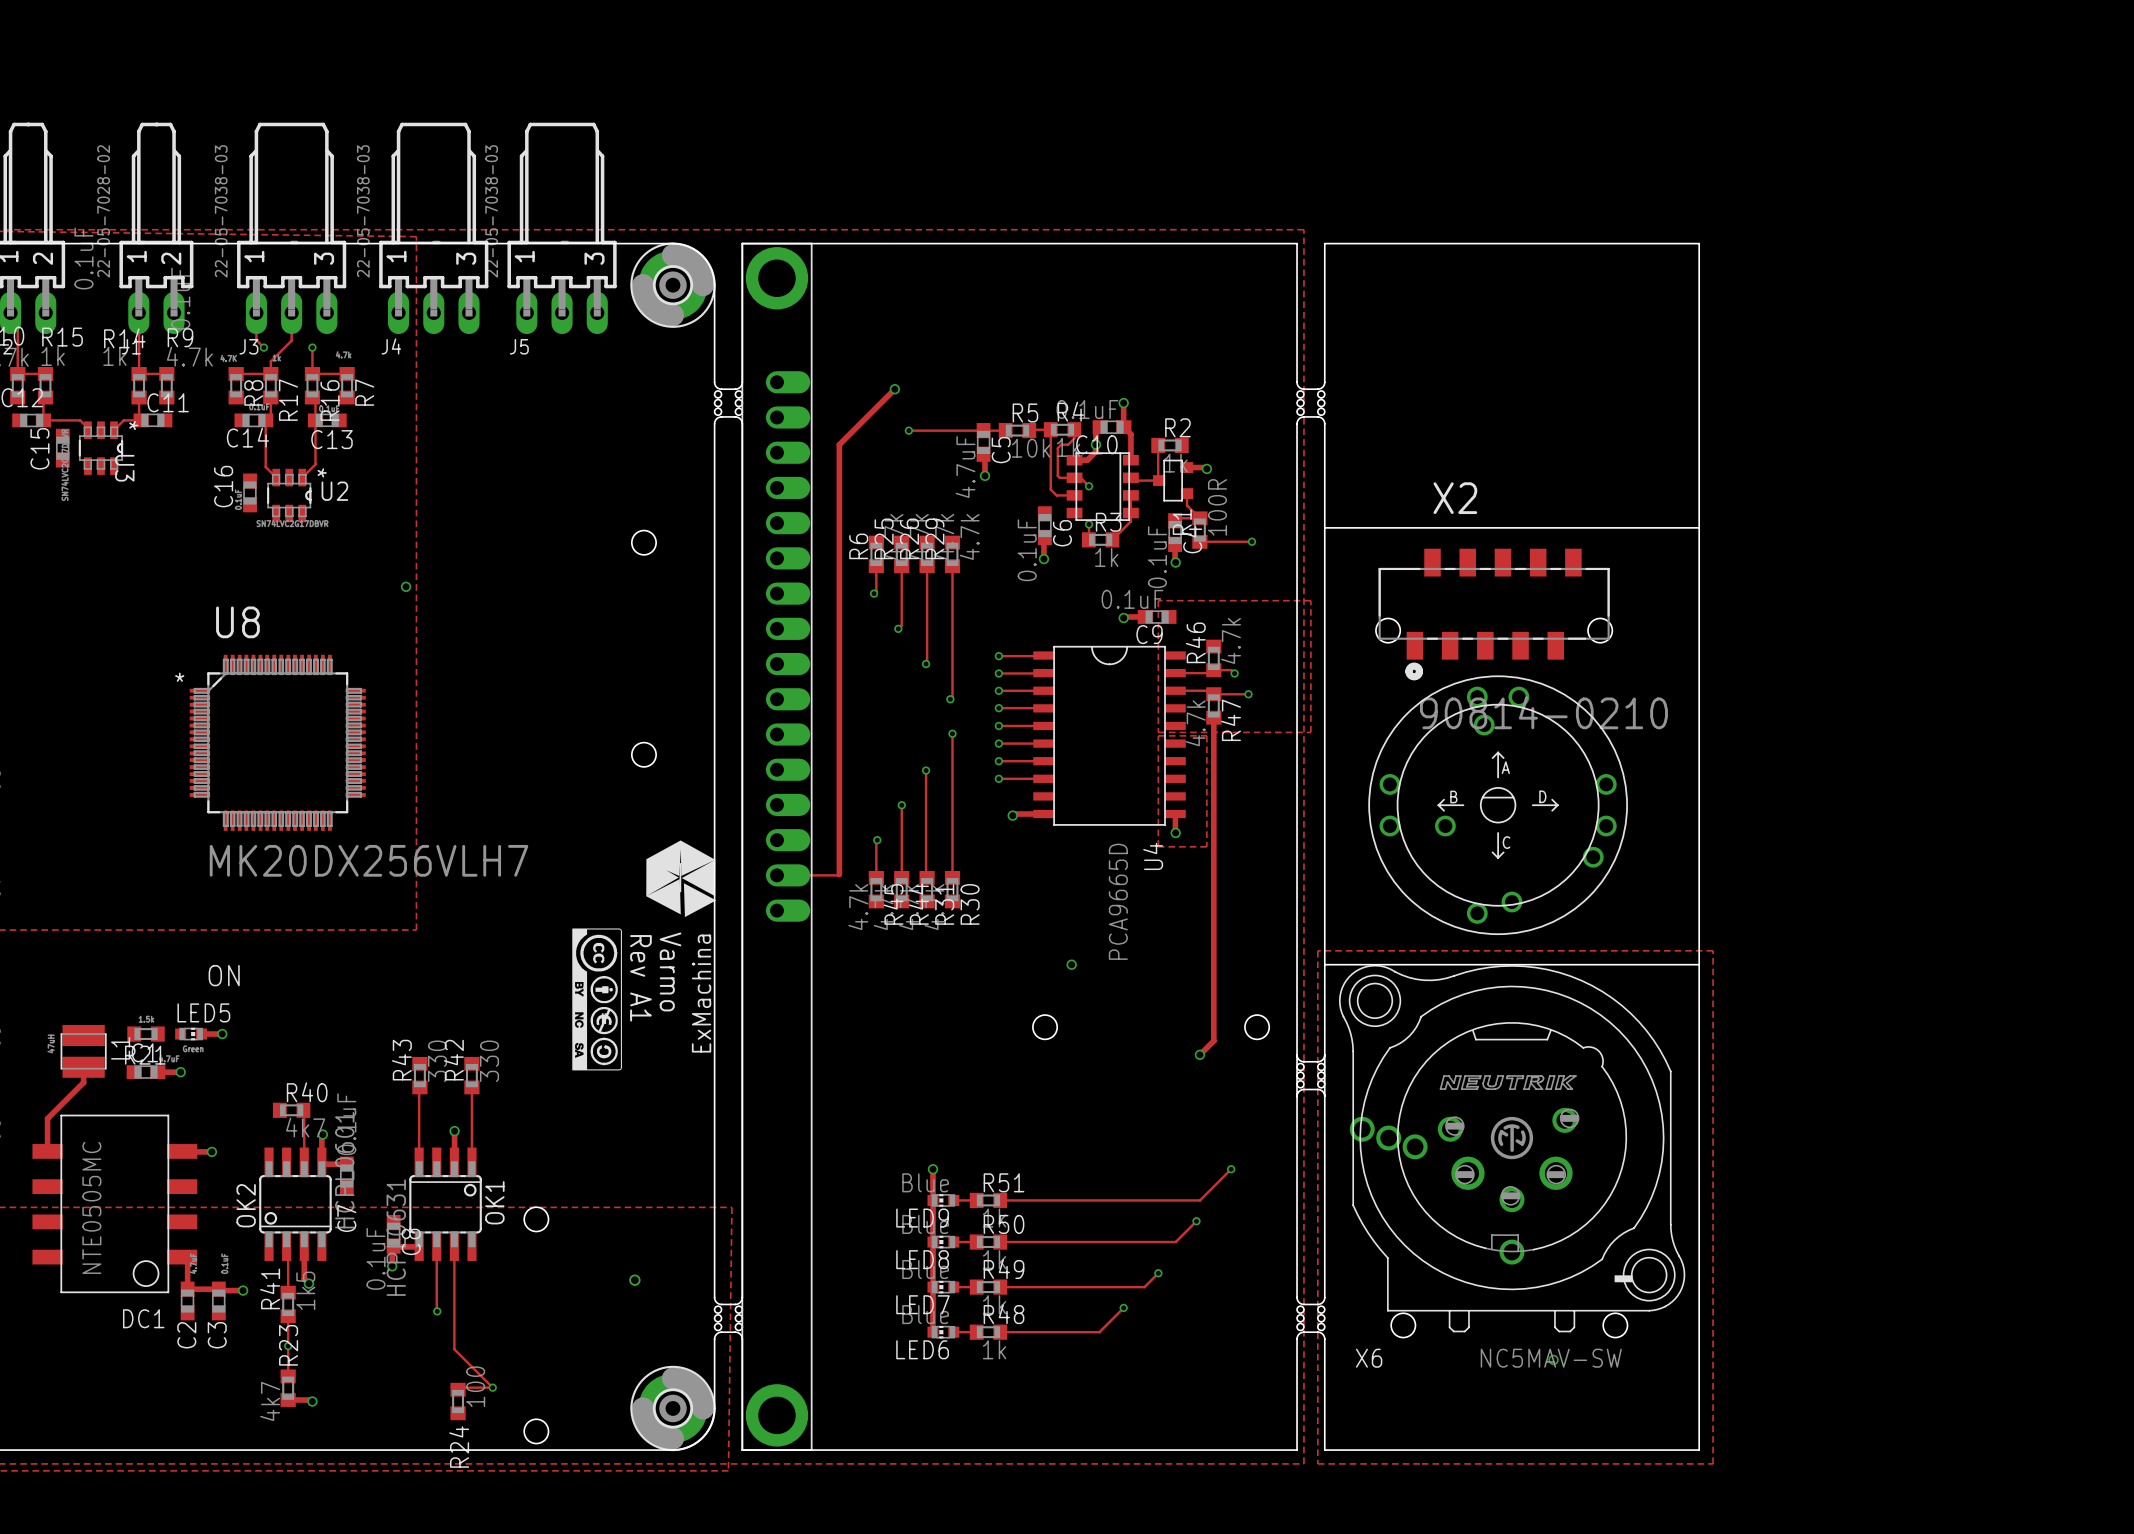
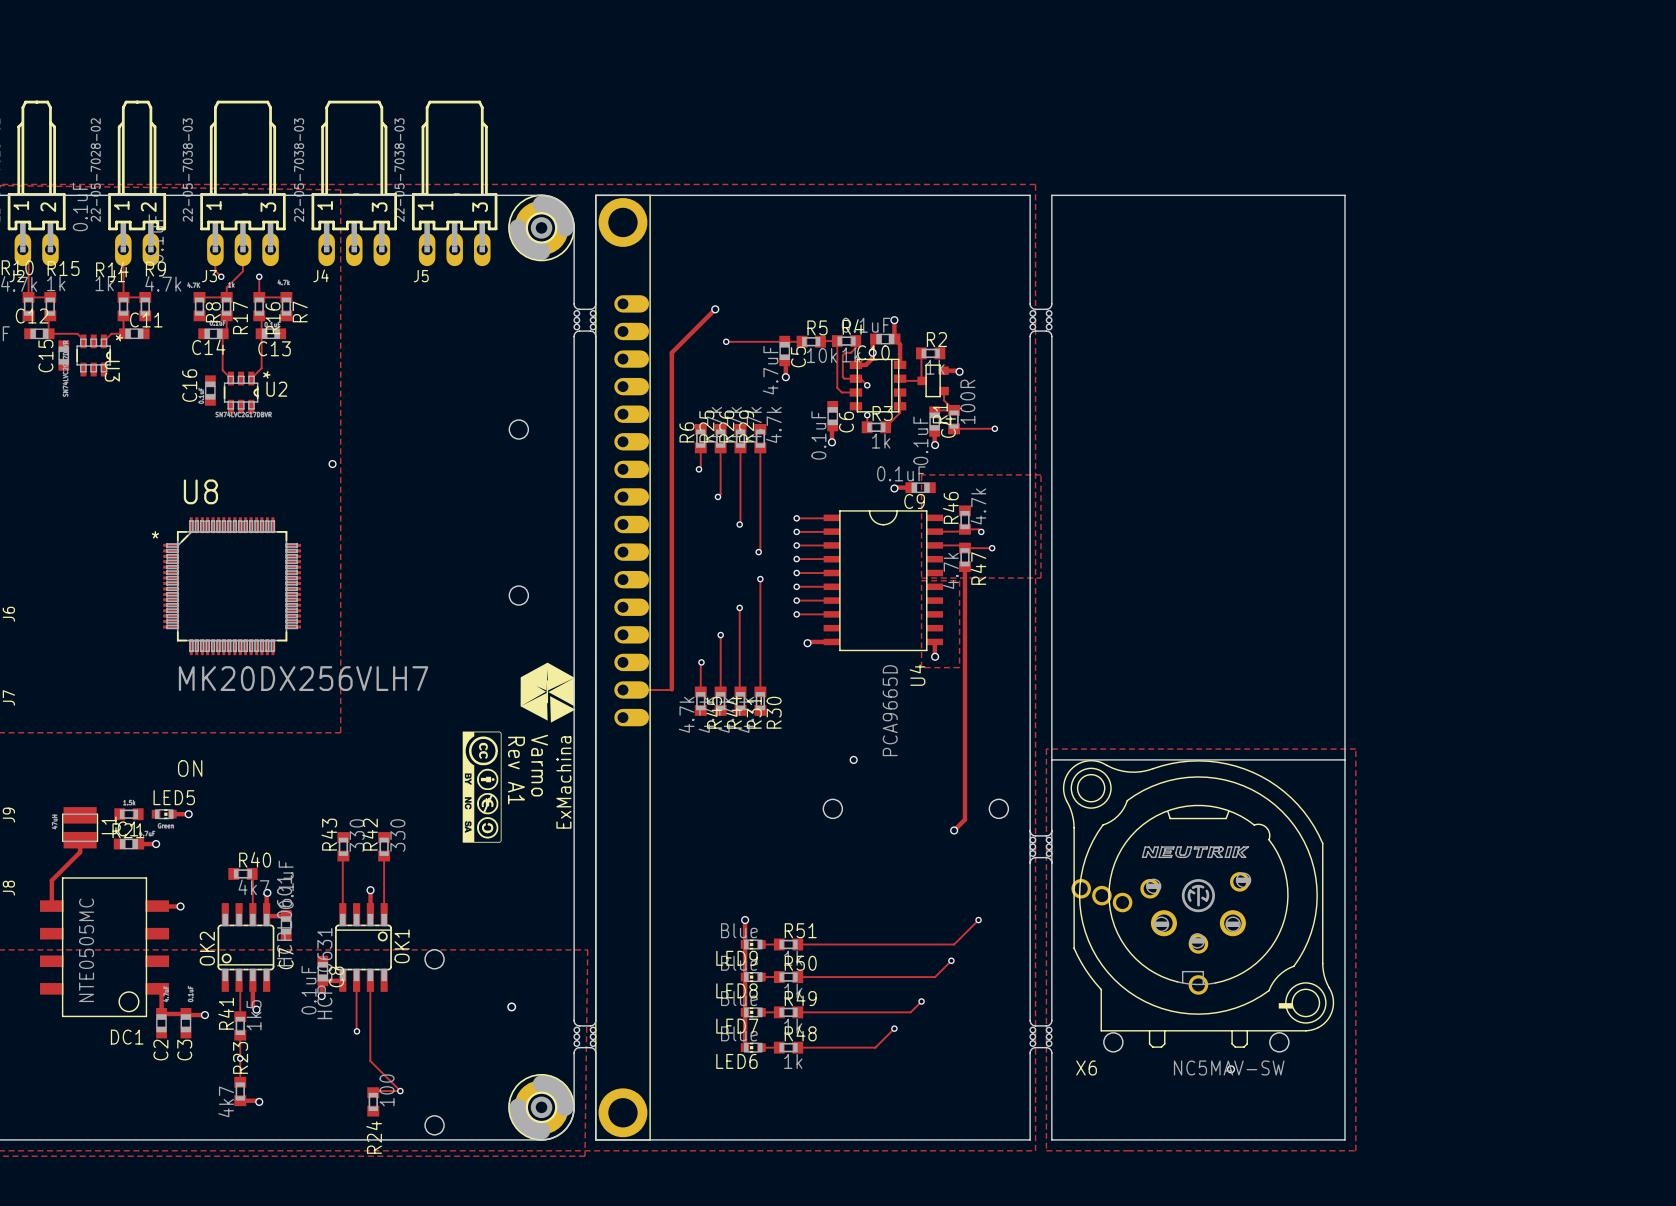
board edge: (1324, 527) (1699, 527) -> none
X2: 90814-0210 (1494, 614) -> none
part: (1498, 805) -> none

